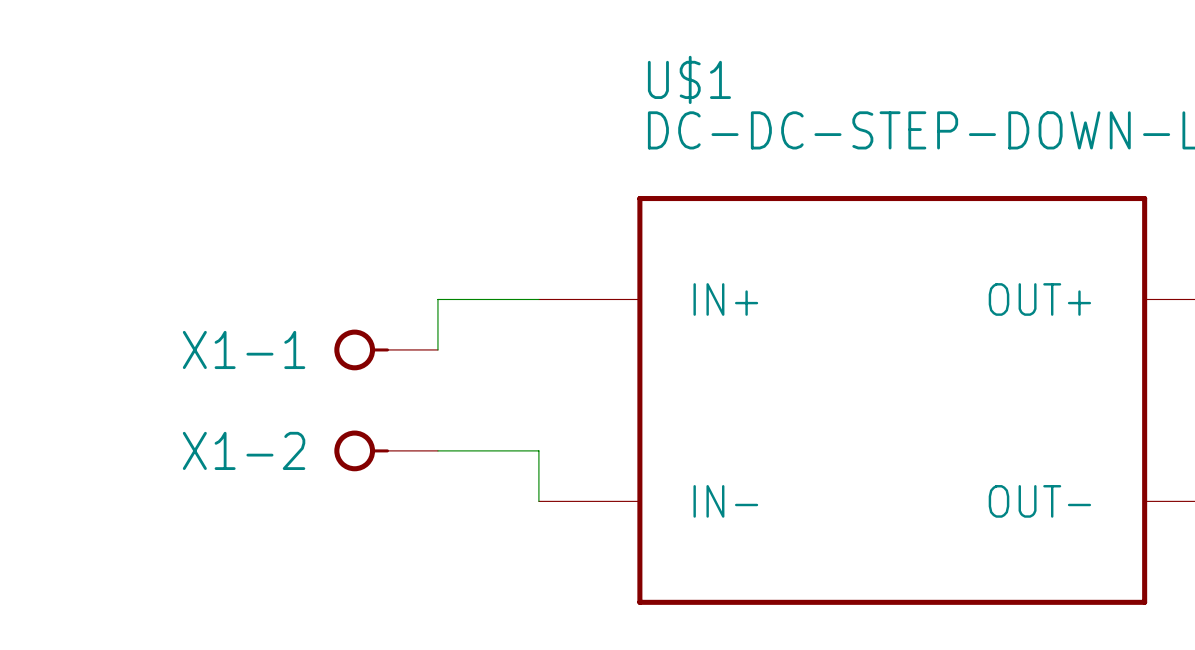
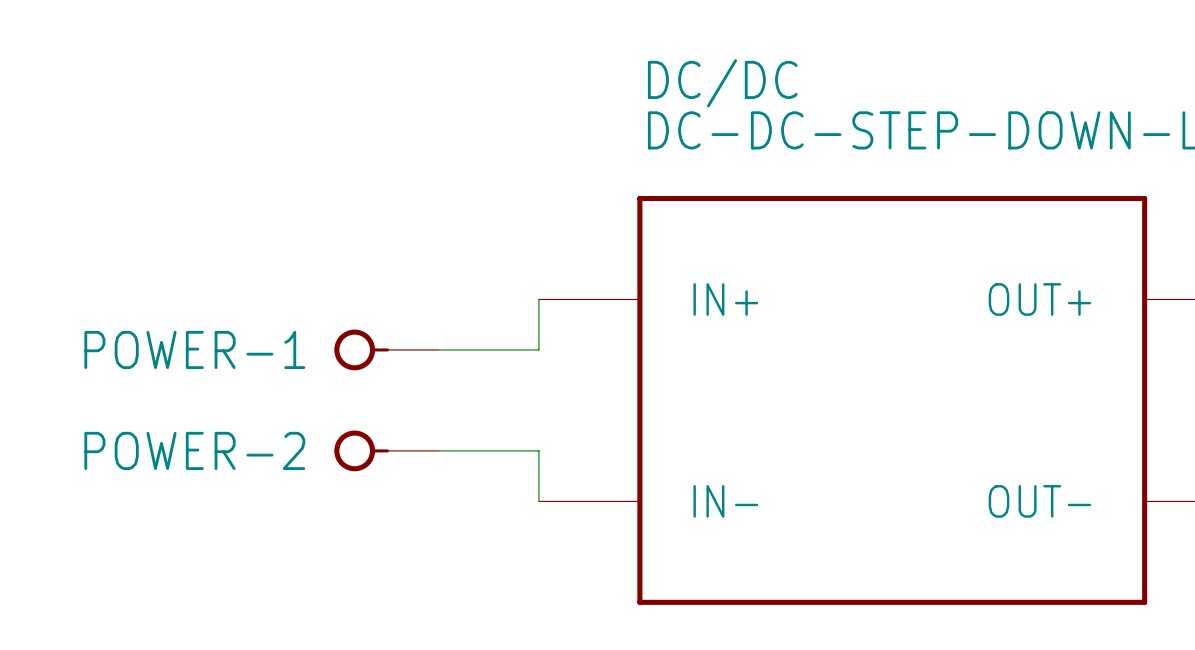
U$1 name: U$1 (689, 79) -> DC/DC (722, 83)
wire: (538, 299) (437, 299) (437, 349) -> (538, 299) (538, 349) (437, 349)
X1-1 name: X1-1 (244, 349) -> POWER-1 (194, 349)
X1-2 name: X1-2 (244, 450) -> POWER-2 (194, 450)

